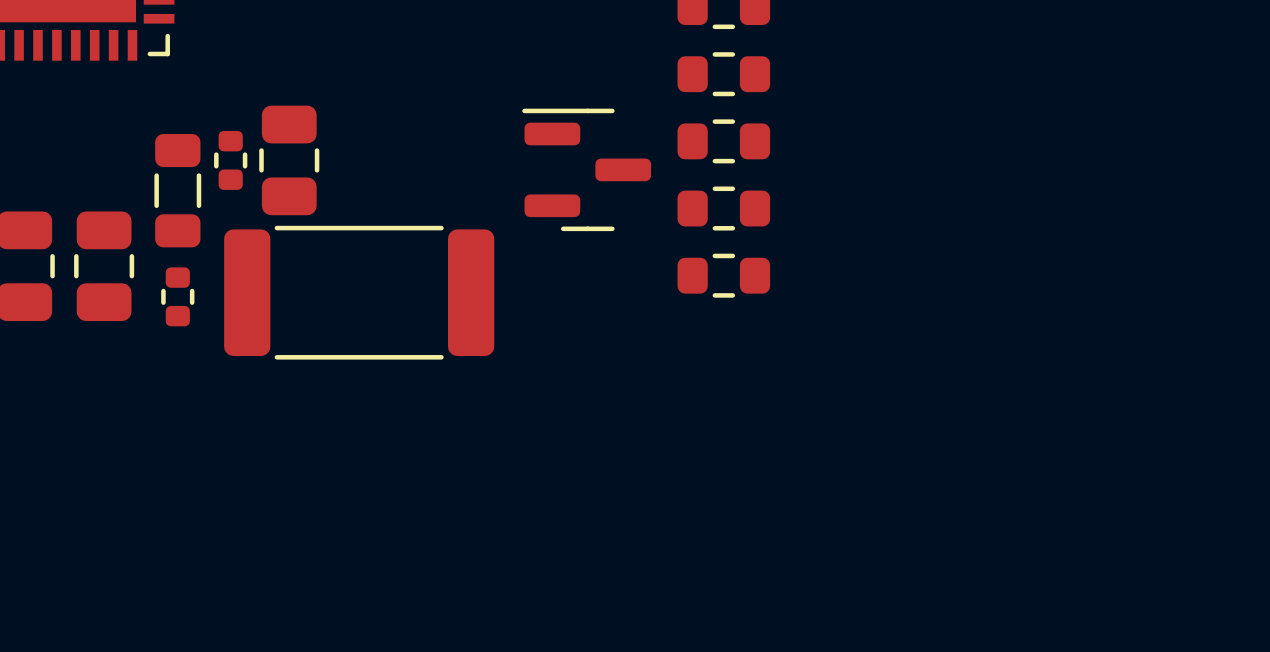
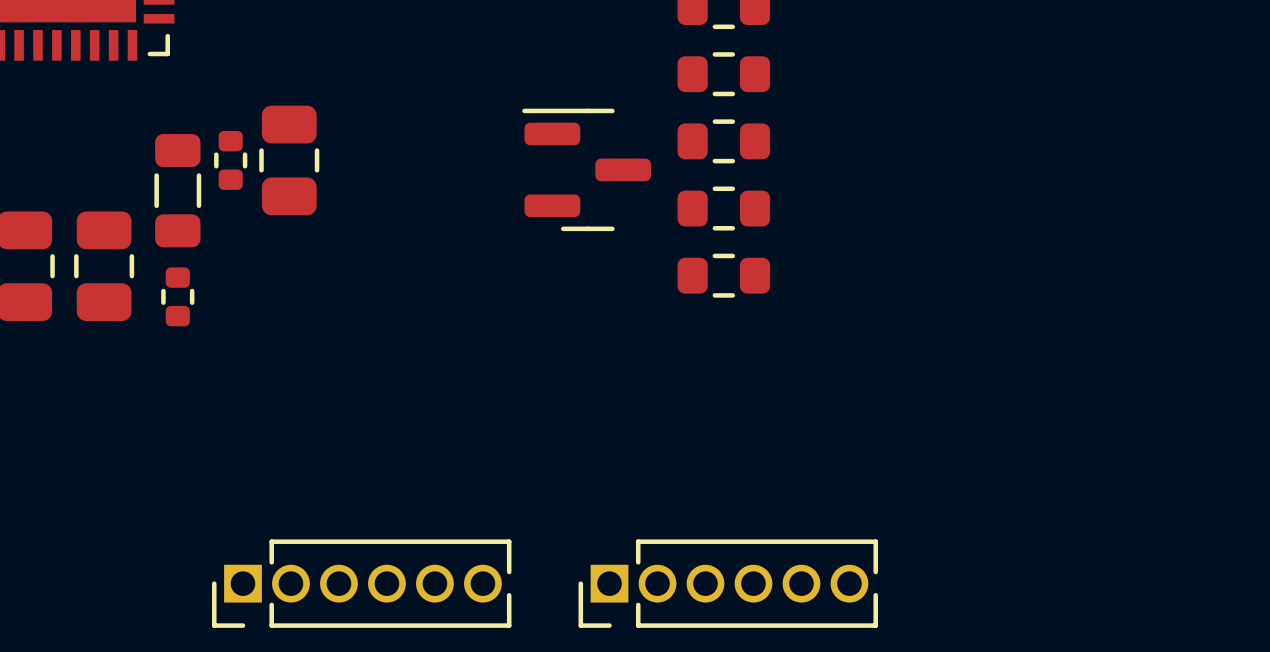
part: (359, 292) -> none
part: none -> (361, 583)
part: none -> (728, 583)

